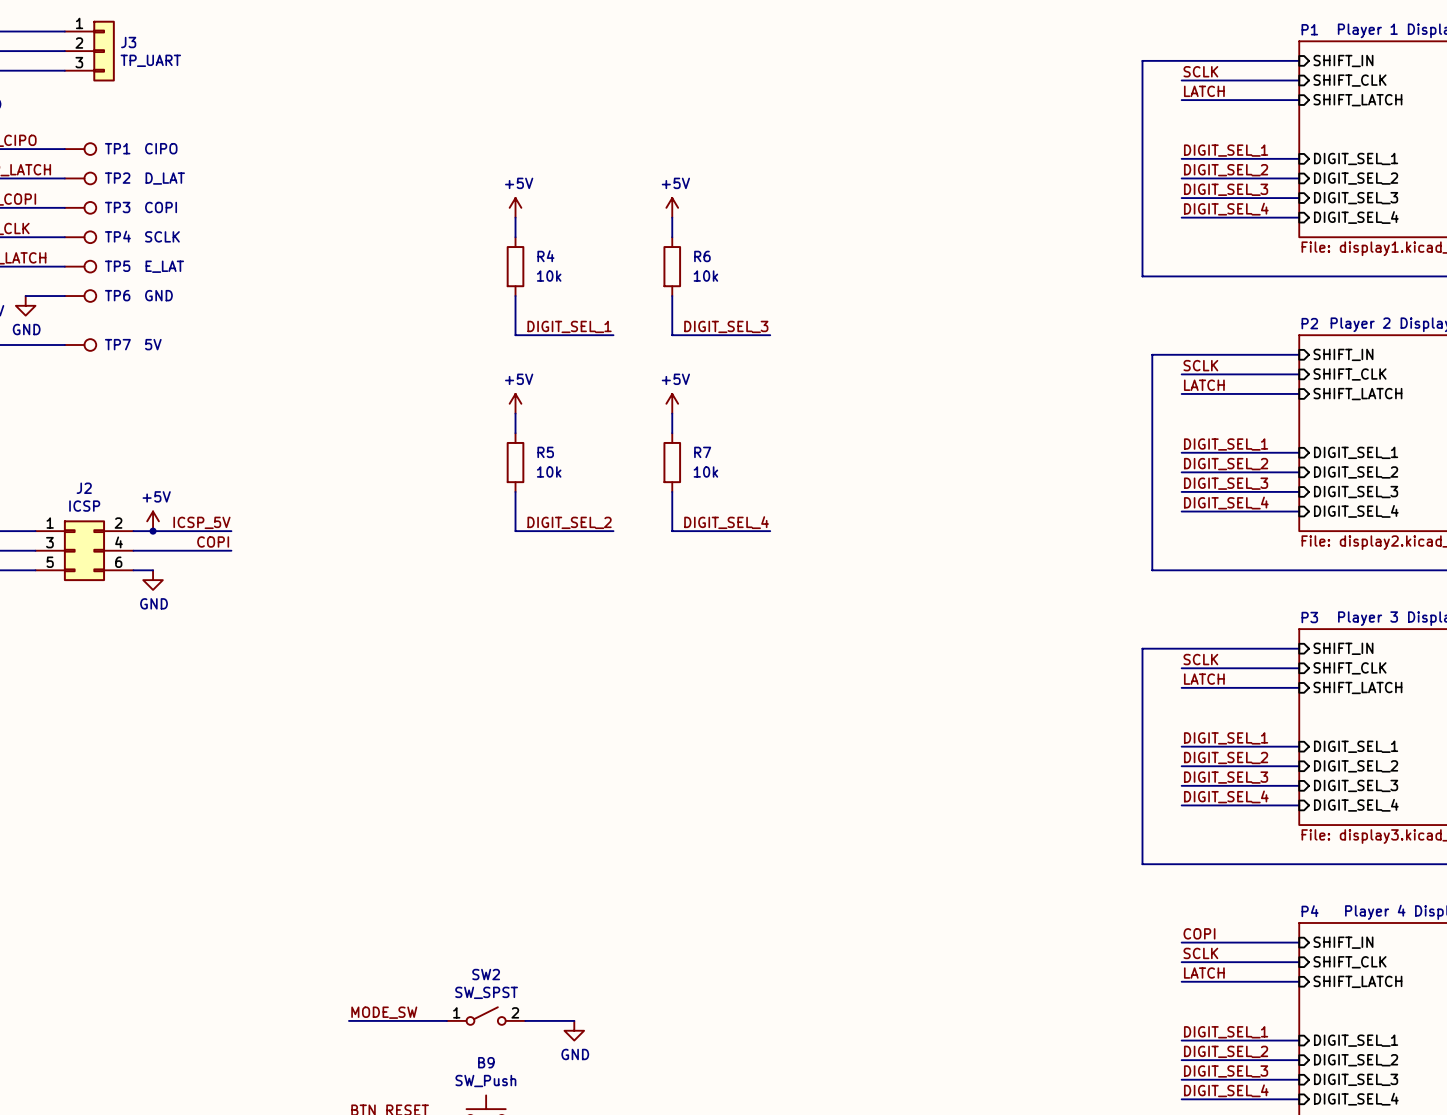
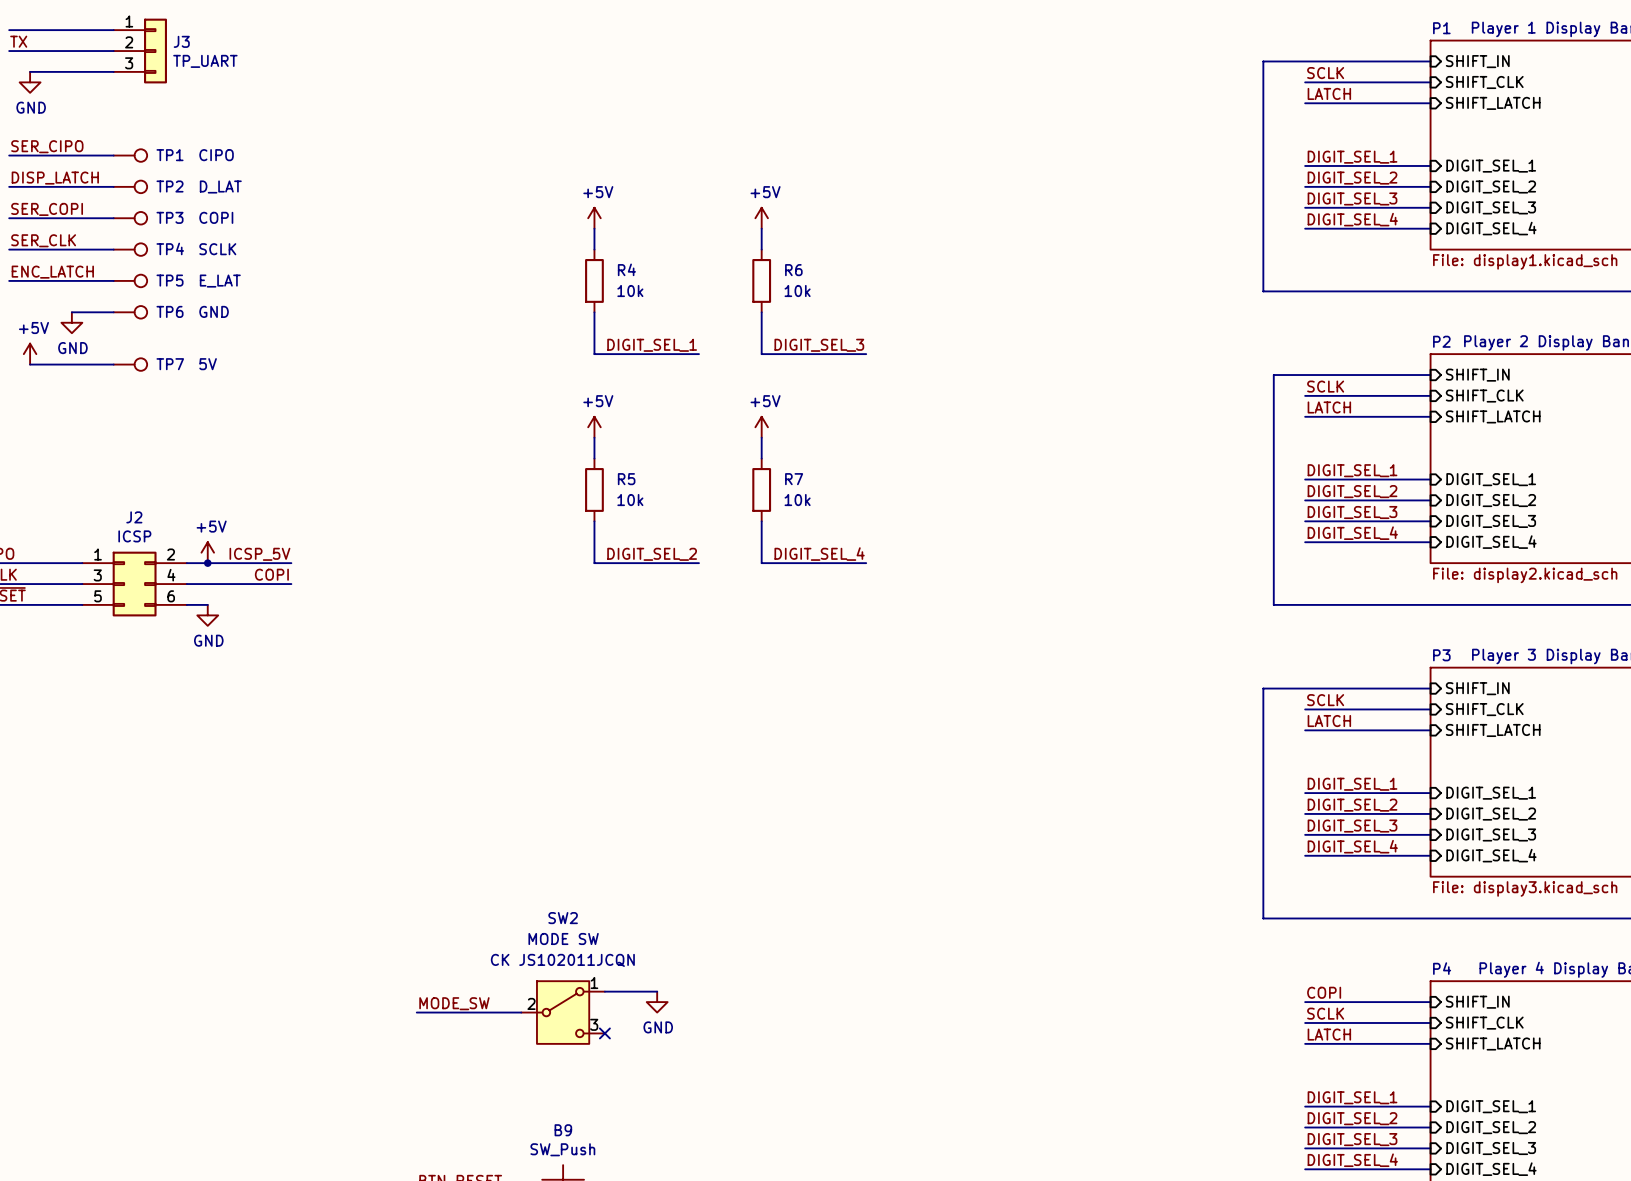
SW2 text: none -> CK JS102011JCQN (562, 960)
no-connect mark: none -> (604, 1033)
SW2 name position: SW2 (486, 974) -> SW2 (563, 918)
SW2 value: SW_SPST (486, 992) -> MODE SW (563, 938)
SW2 symbol: [446, 1007, 526, 1025] -> [521, 981, 605, 1044]
label position: MODE_SW (384, 1012) -> MODE_SW (454, 1003)
wire: (348, 1020) (446, 1020) -> (416, 1012) (521, 1012)
wire: (525, 1020) (574, 1020) -> (604, 991) (657, 991)
power symbol position: GND (574, 1030) -> GND (657, 1002)

